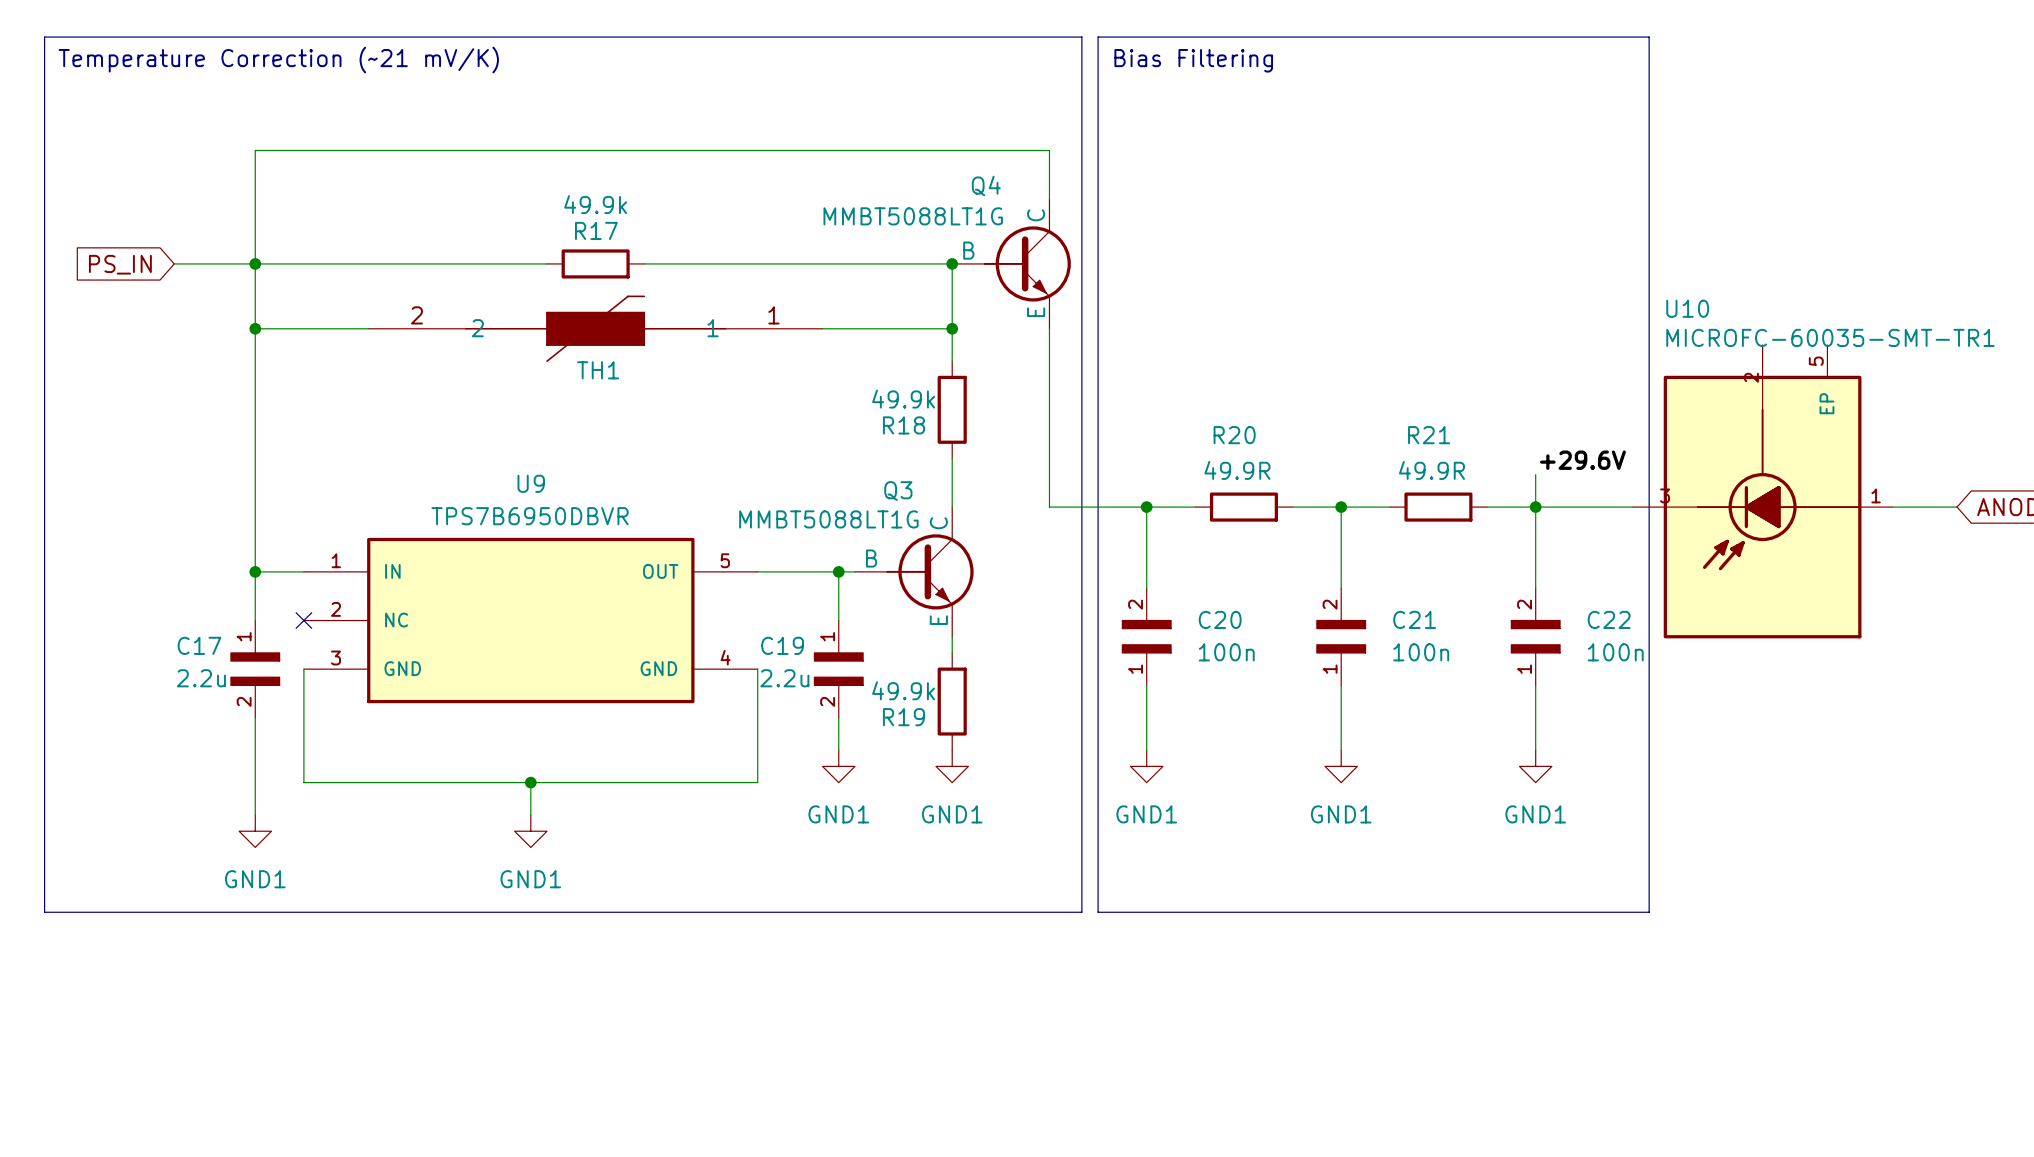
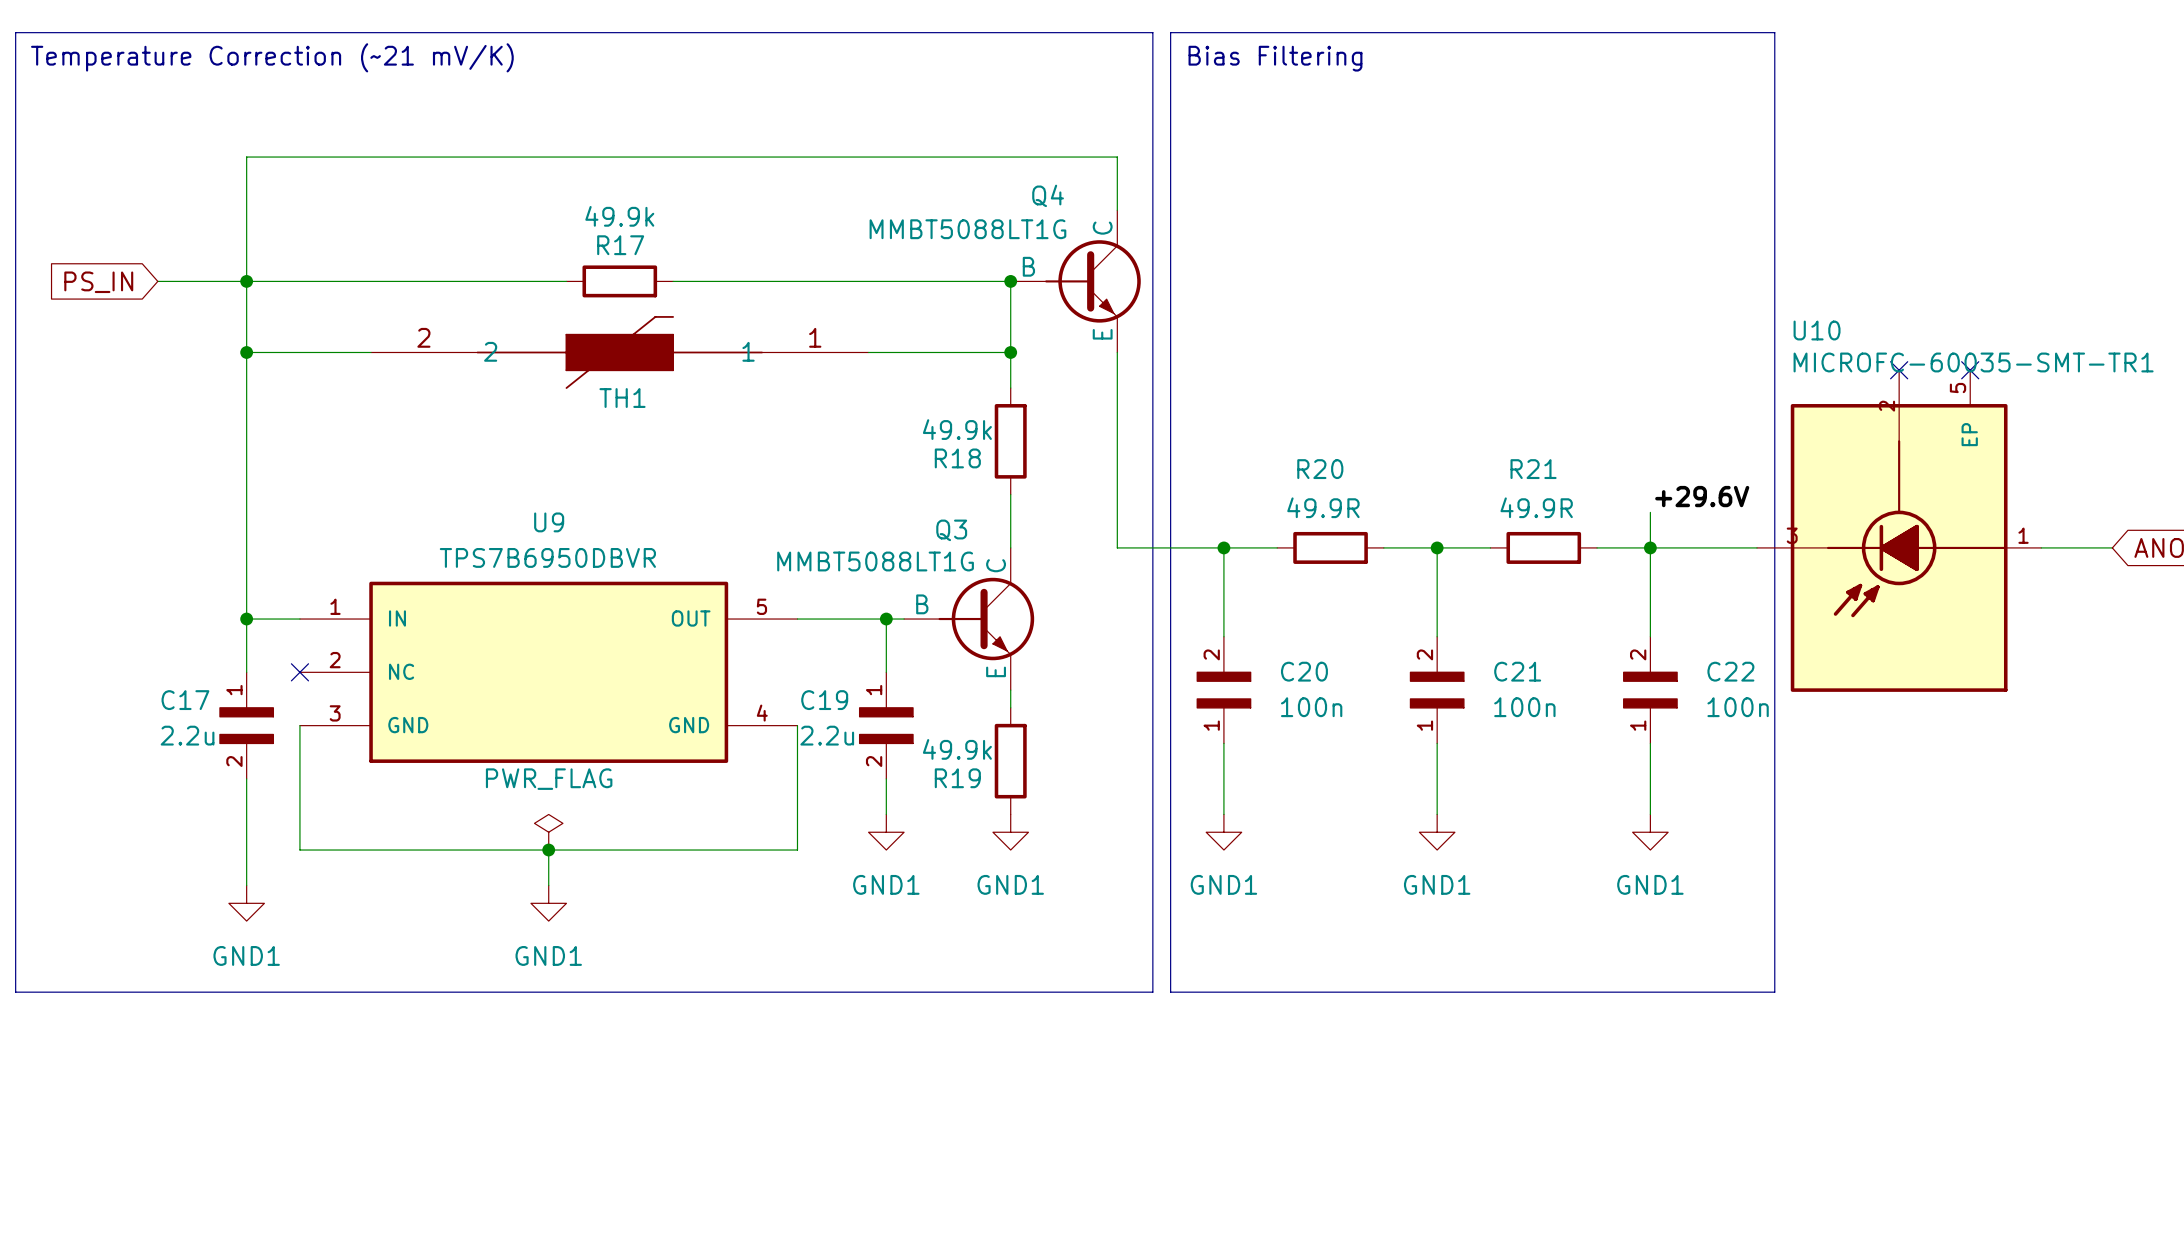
no-connect mark: none -> (1899, 370)
no-connect mark: none -> (1970, 370)
power symbol: none -> PWR_FLAG (548, 832)

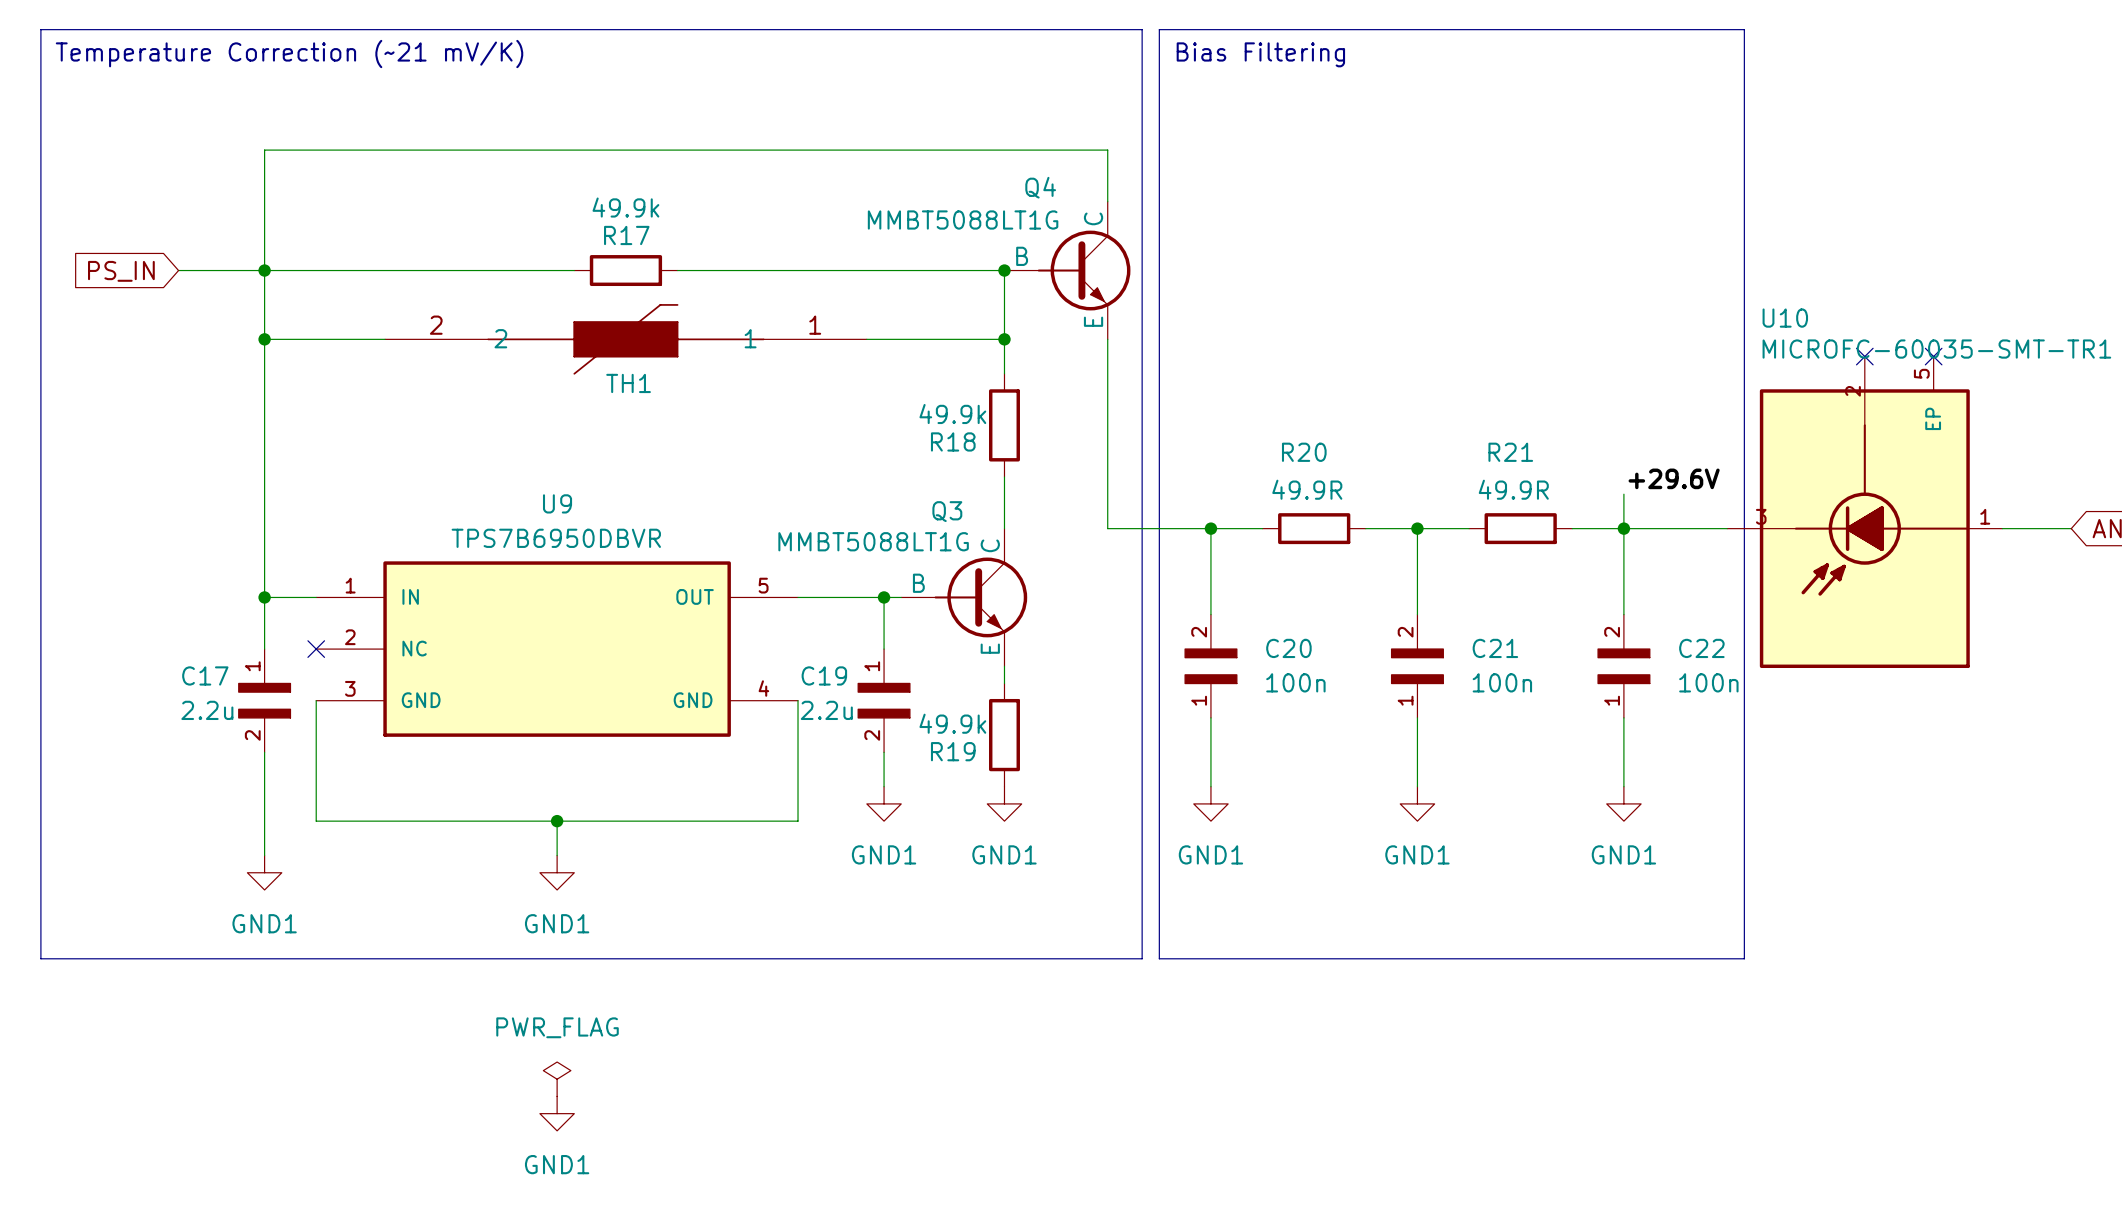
power symbol position: PWR_FLAG (548, 832) -> PWR_FLAG (557, 1079)
power symbol: none -> GND1 (557, 1113)

